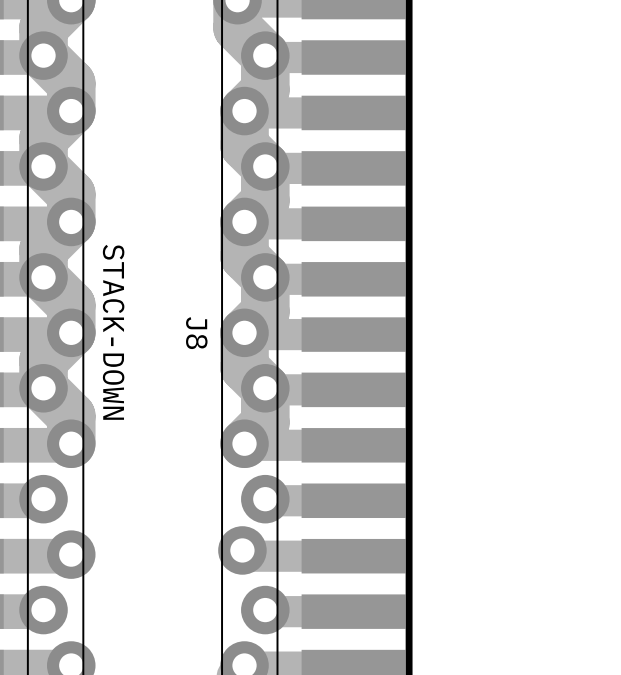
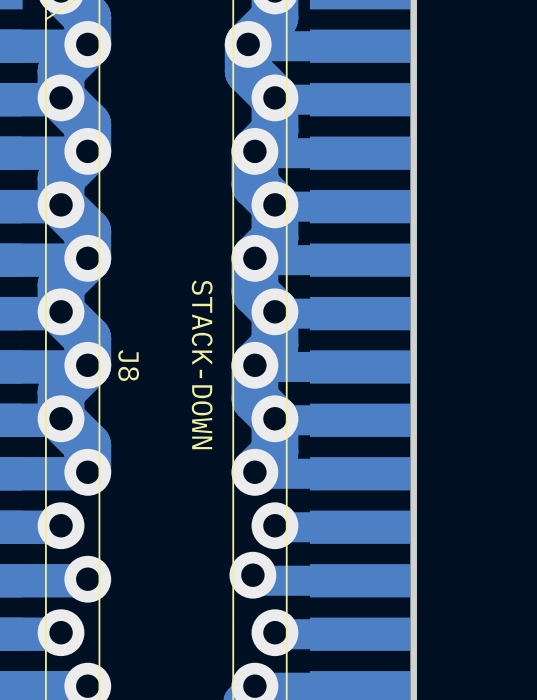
J8 value position: STACK-DOWN (113, 332) -> STACK-DOWN (202, 364)
J8 name position: J8 (196, 333) -> J8 (128, 365)

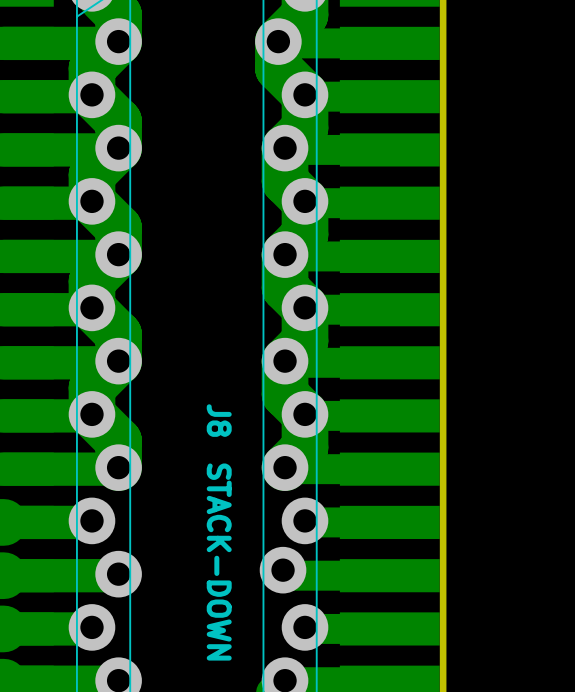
J8 value position: STACK-DOWN (202, 364) -> STACK-DOWN (219, 562)
J8 name position: J8 (128, 365) -> J8 (219, 420)

